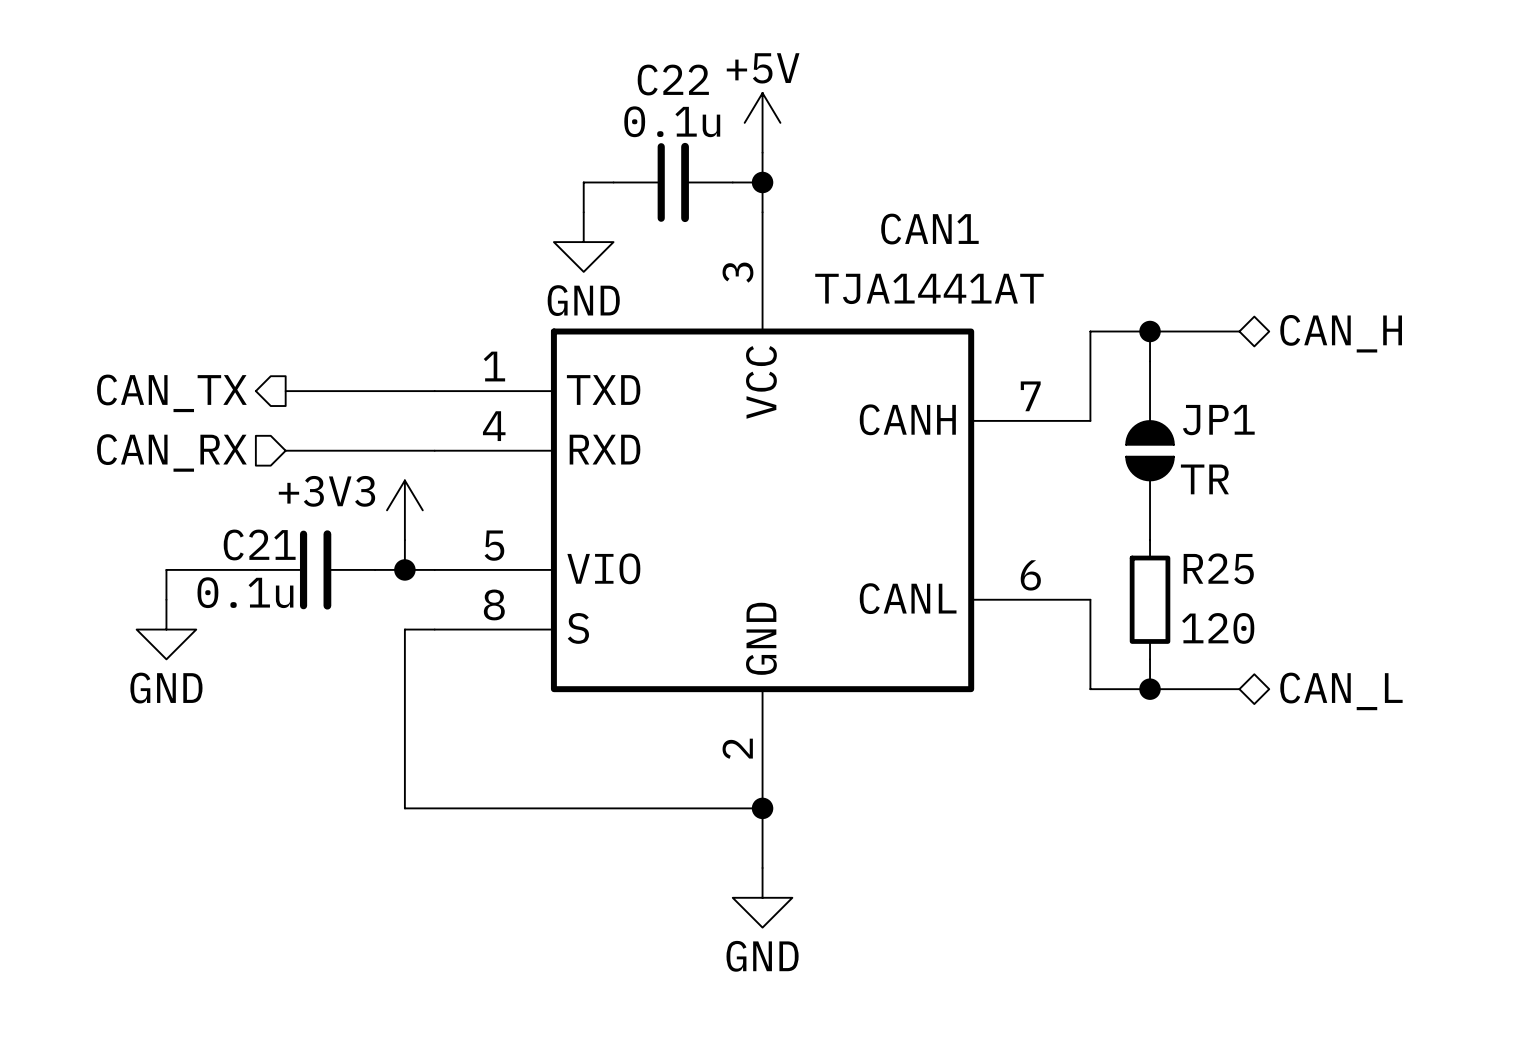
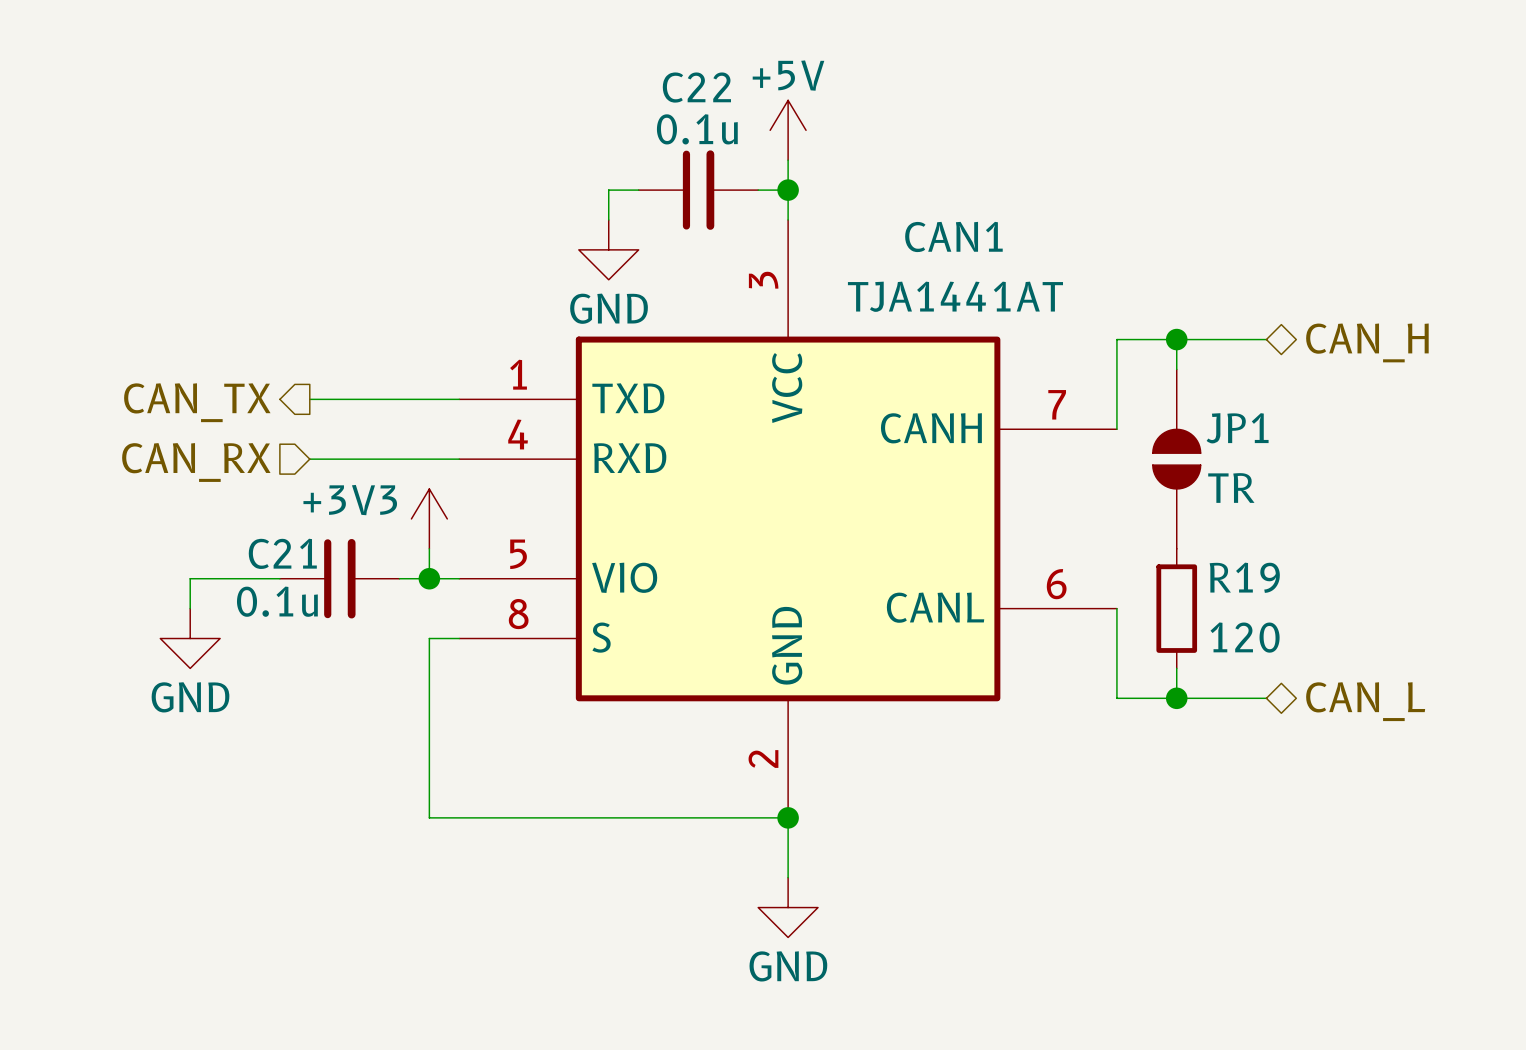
R25 name: R25 (1218, 568) -> R19 (1244, 577)

